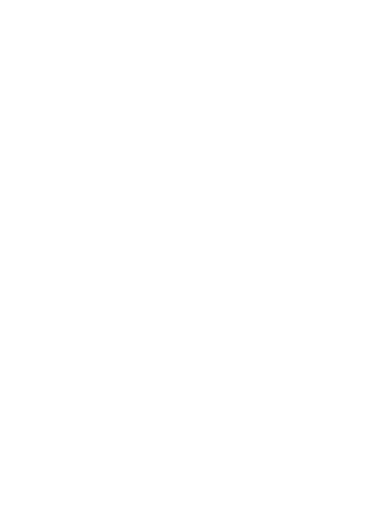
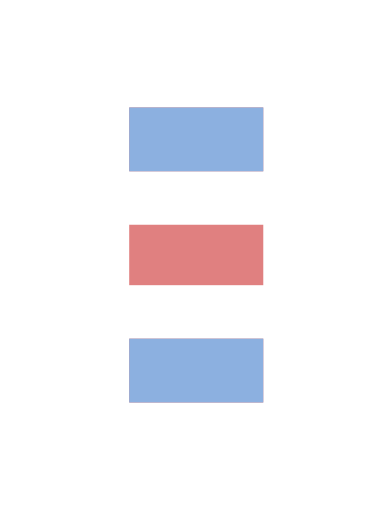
part: none -> (196, 254)

